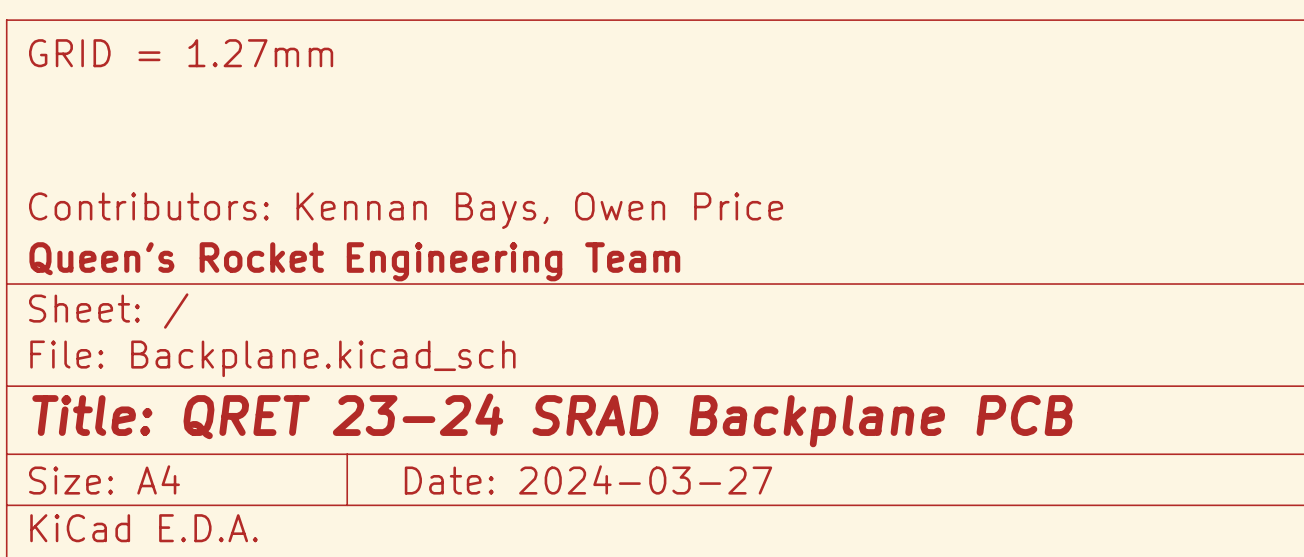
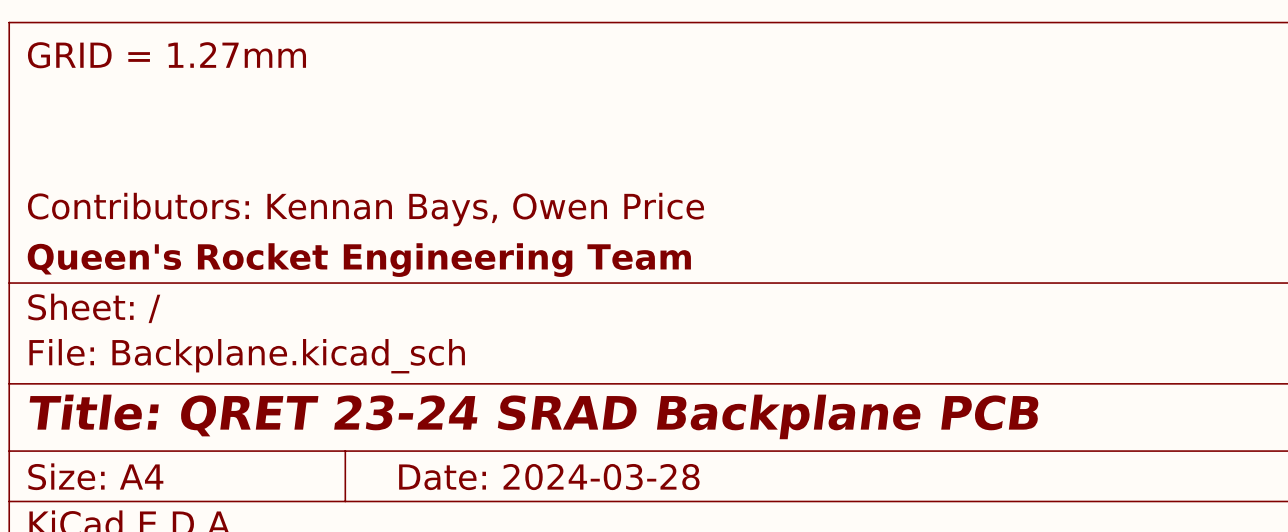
title block: Date: 2024-03-27 (588, 479) -> Date: 2024-03-28 (549, 477)

